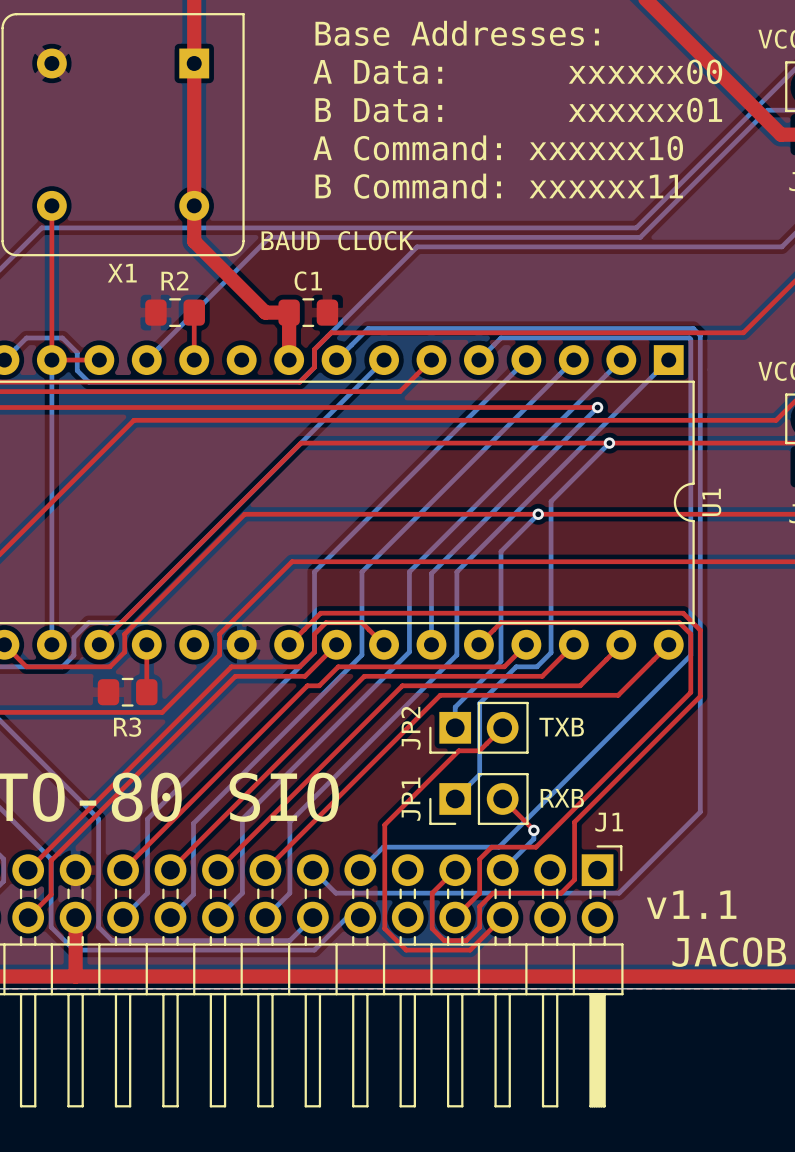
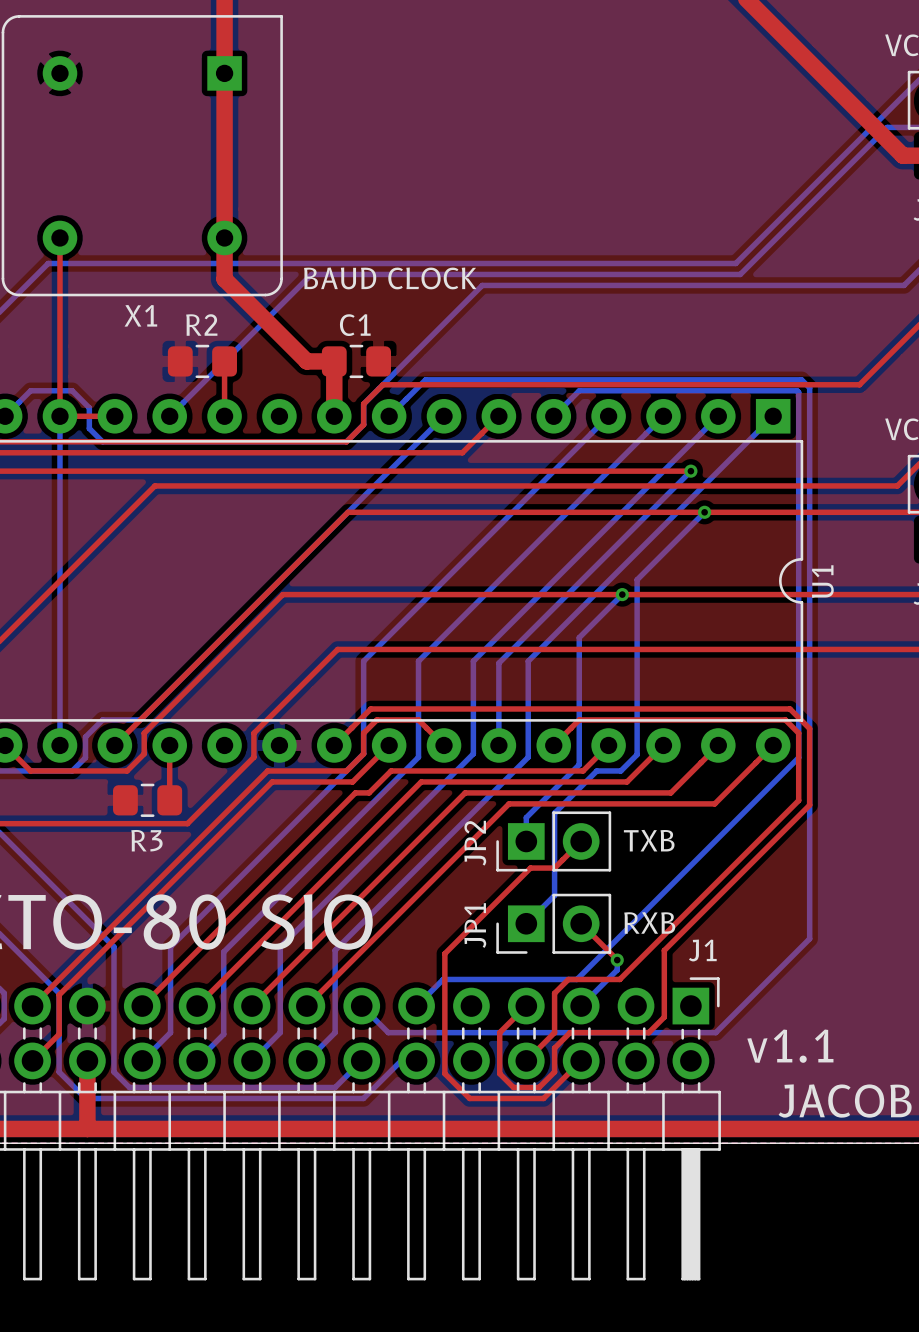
text: Base Addresses: (457, 33) -> none
text: A Data: xxxxxx00 (517, 71) -> none
text: B Data: xxxxxx01 (518, 110) -> none
text: A Command: xxxxxx10 (498, 147) -> none
text: B Command: xxxxxx11 (499, 186) -> none

